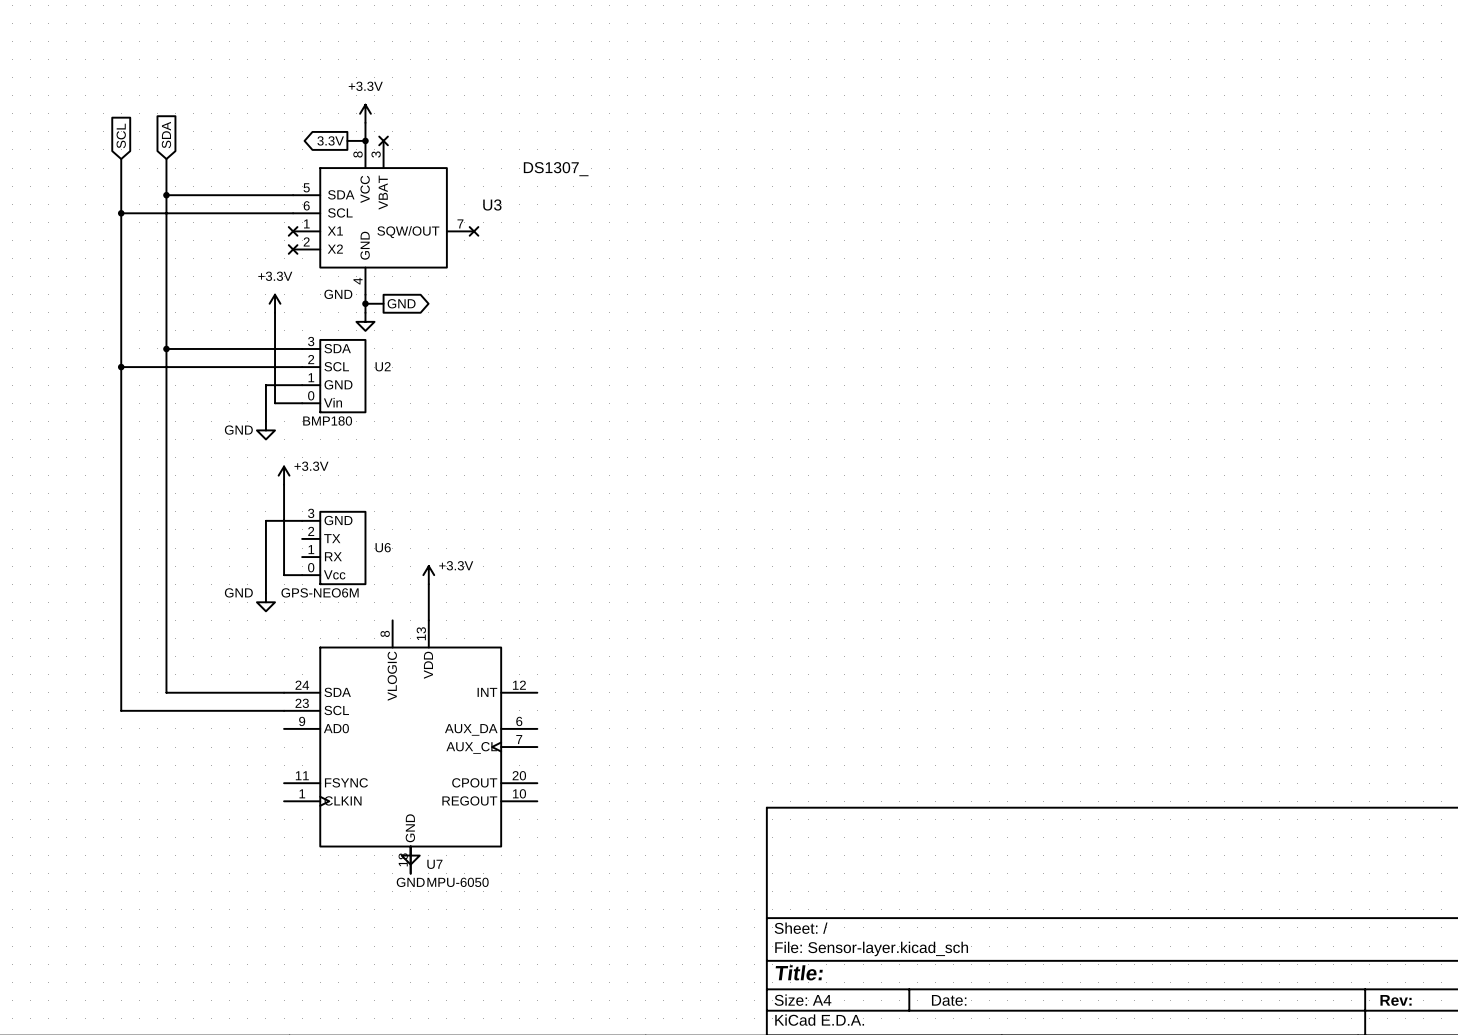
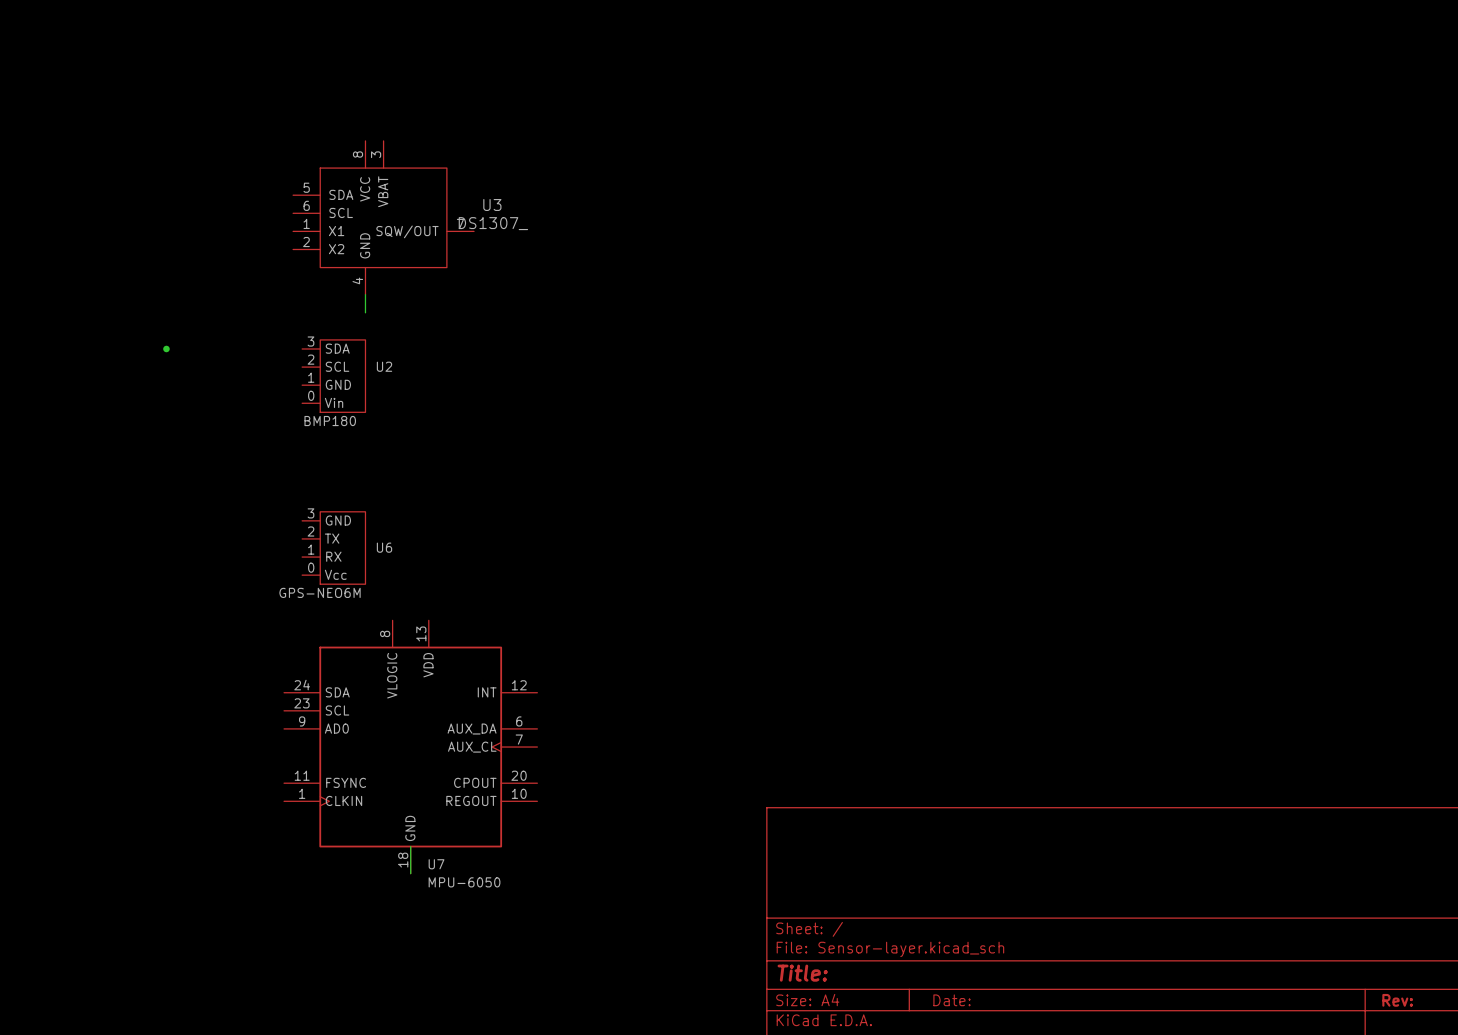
power symbol: +3.3V (365, 113) -> none
wire: (365, 122) (365, 140) (347, 140) -> none
global label: SCL (121, 135) -> none
global label: SDA (166, 135) -> none
global label: 3.3V (330, 140) -> none
junction: (365, 140) -> none
no-connect mark: (383, 140) -> none
wire: (121, 159) (121, 710) (284, 710) -> none
wire: (166, 159) (166, 692) (284, 692) -> none
U3 value position: DS1307_ (556, 169) -> DS1307_ (493, 223)
wire: (166, 195) (293, 195) -> none
junction: (166, 195) -> none
wire: (121, 213) (293, 213) -> none
junction: (121, 213) -> none
no-connect mark: (293, 231) -> none
no-connect mark: (474, 231) -> none
no-connect mark: (293, 249) -> none
power symbol: +3.3V (275, 303) -> none
wire: (365, 303) (383, 303) -> none
junction: (365, 303) -> none
global label: GND (401, 303) -> none
wire: (275, 312) (275, 403) (302, 403) -> none
power symbol: GND (365, 321) -> none
wire: (166, 348) (302, 348) -> none
wire: (121, 367) (302, 367) -> none
junction: (121, 367) -> none
wire: (302, 385) (265, 385) (265, 421) -> none
power symbol: GND (265, 430) -> none
power symbol: +3.3V (284, 475) -> none
wire: (284, 484) (284, 575) (302, 575) -> none
wire: (302, 520) (265, 520) (265, 593) -> none
power symbol: +3.3V (428, 575) -> none
wire: (428, 584) (428, 620) -> none
power symbol: GND (265, 602) -> none
power symbol: GND (410, 855) -> none

